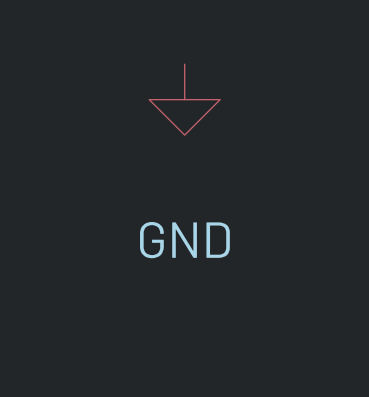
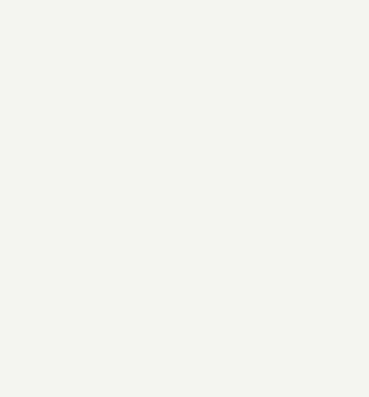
power symbol: GND (184, 99) -> none

